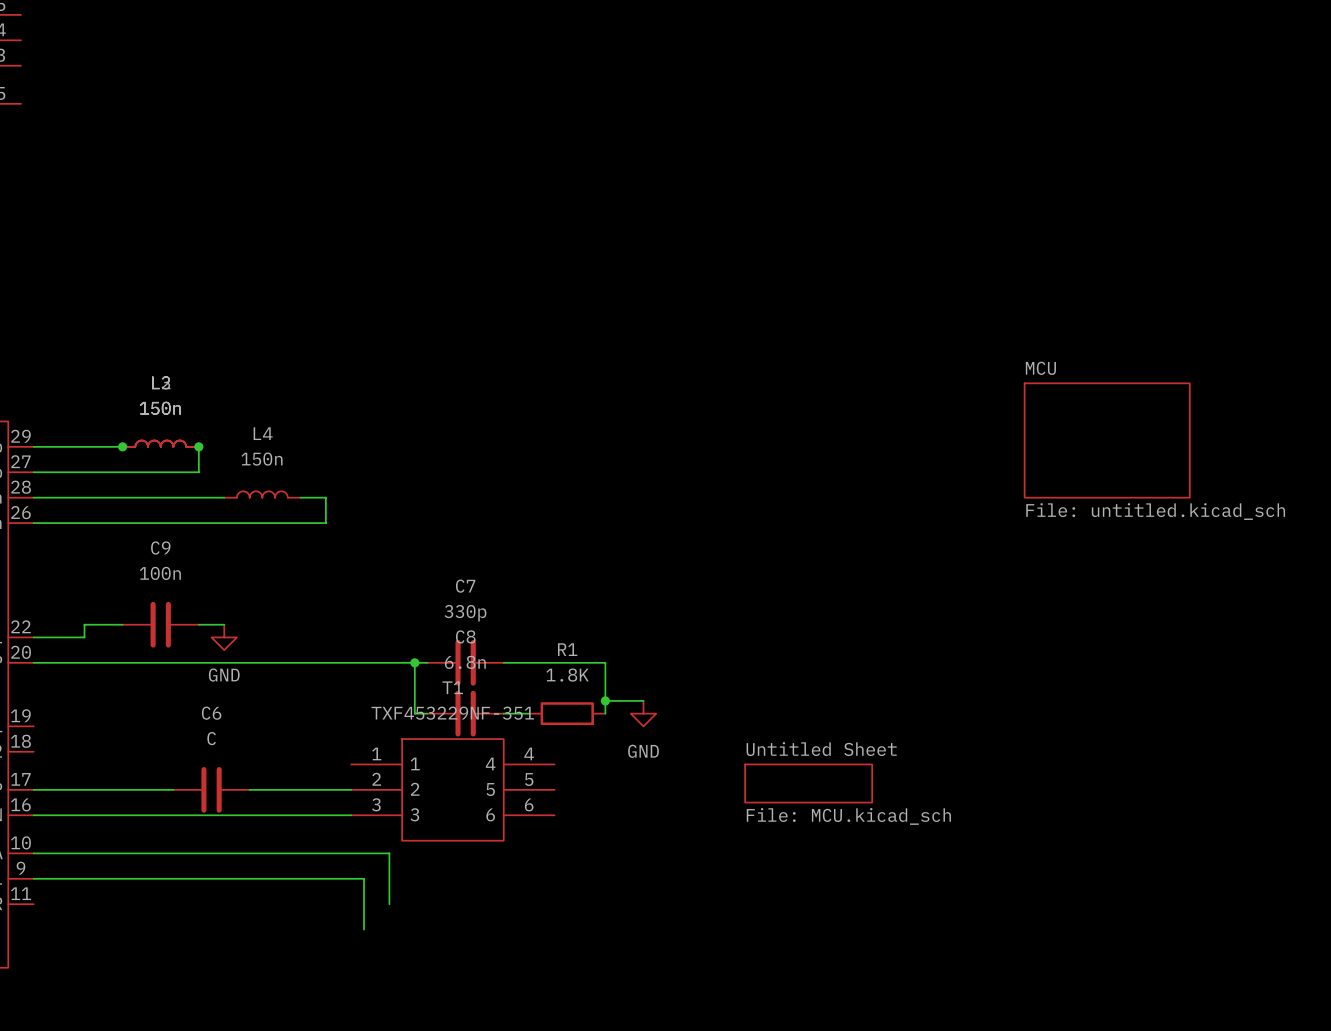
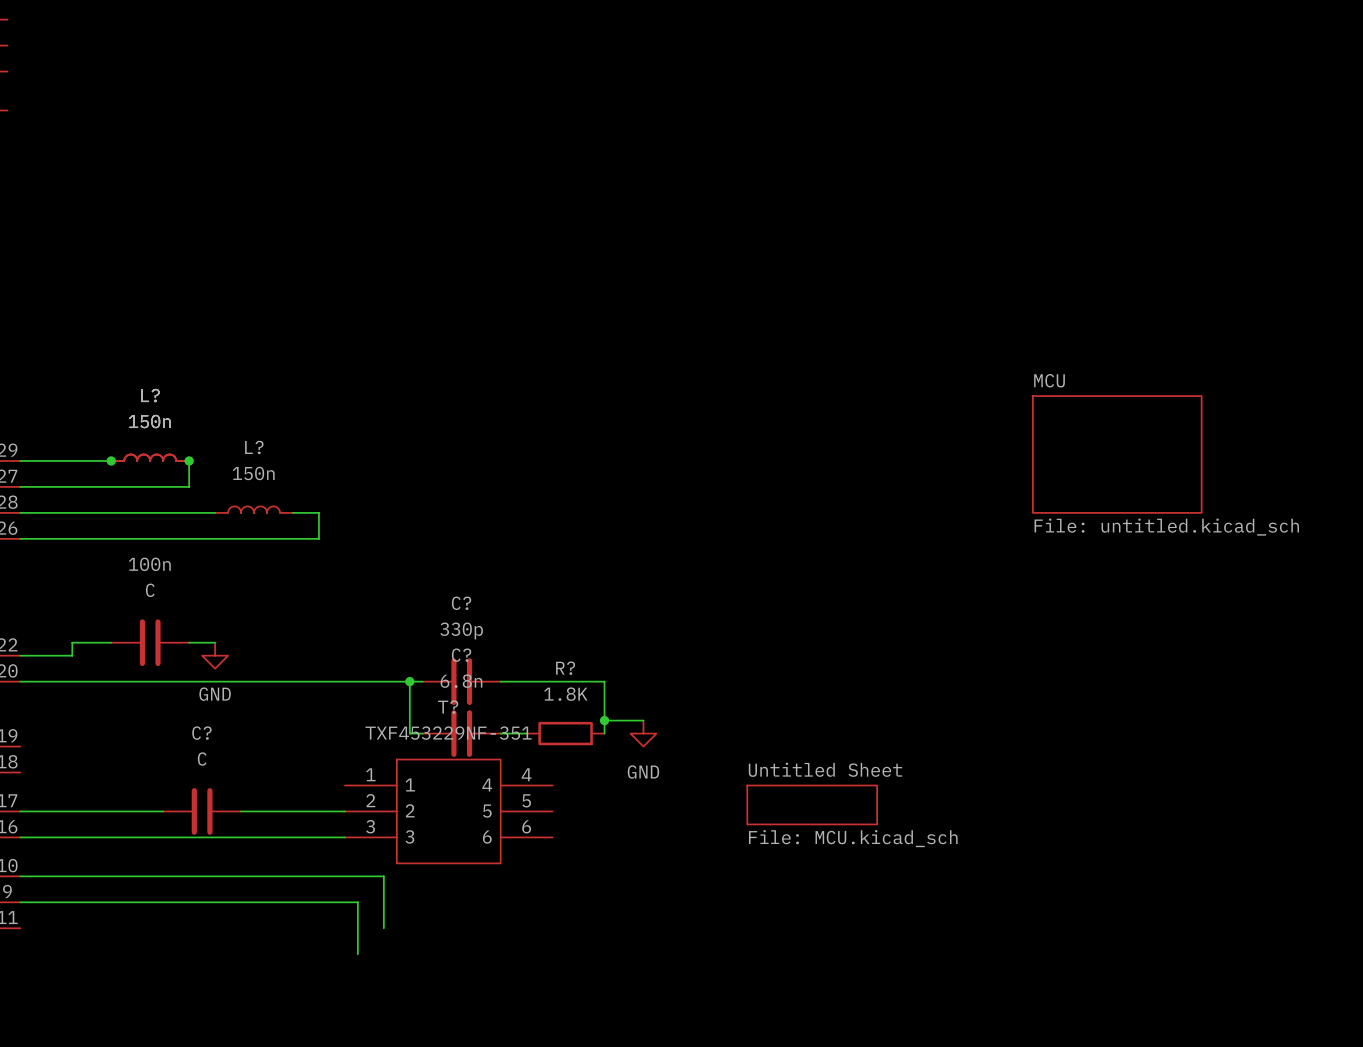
L4 name: L4 (263, 433) -> L? (254, 447)
part: 150n (160, 443) -> none
part: 150n (160, 443) -> none
L?: none -> 150n (150, 457)
C9 name: C9 (160, 548) -> 100n (149, 564)
C9 value: 100n (160, 573) -> C (150, 590)
C7 name: C7 (465, 586) -> C? (461, 603)
C8 name: C8 (465, 636) -> C? (461, 655)
R1 name: R1 (567, 649) -> R? (565, 668)
T1 name: T1 (452, 687) -> T? (448, 707)
C6 name: C6 (211, 713) -> C? (201, 733)

